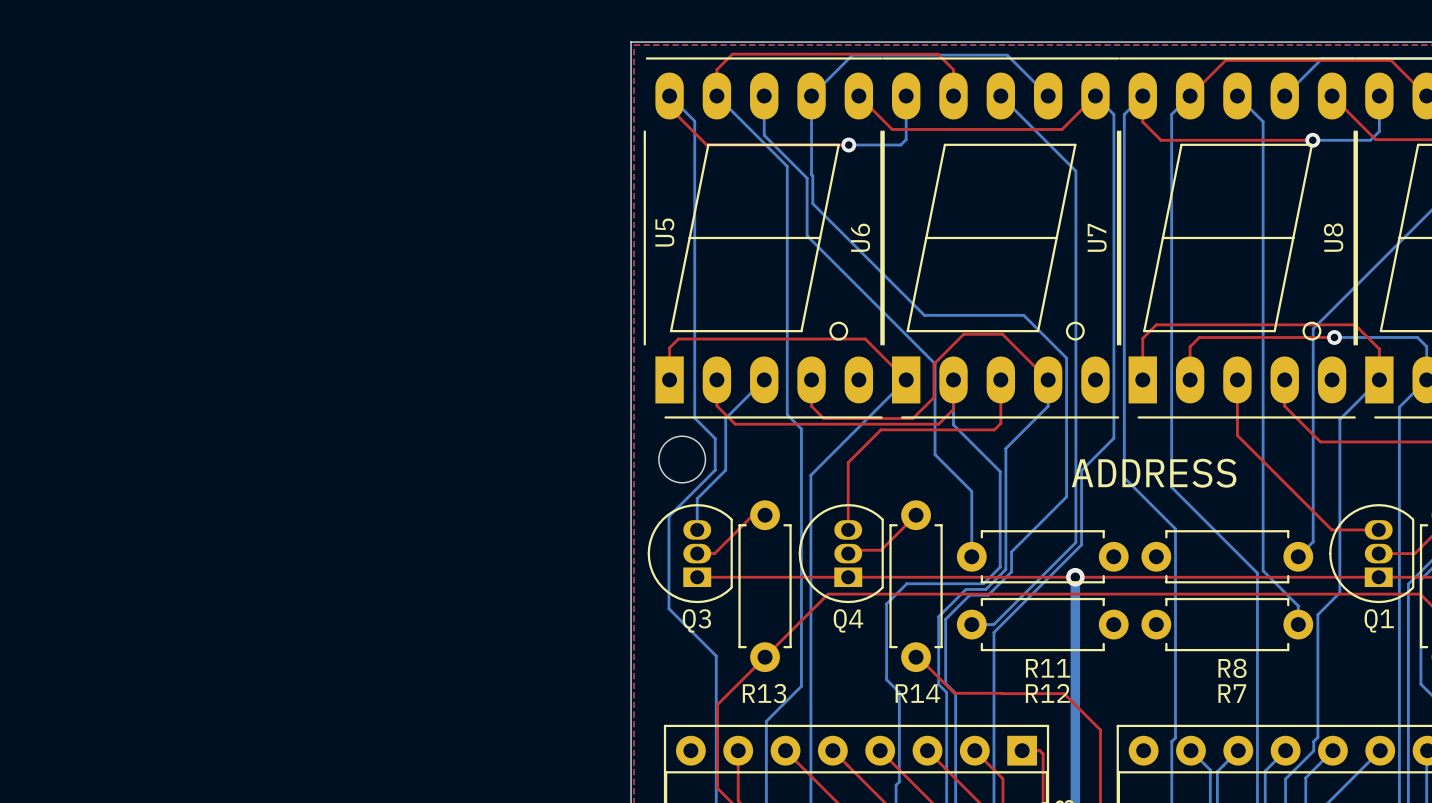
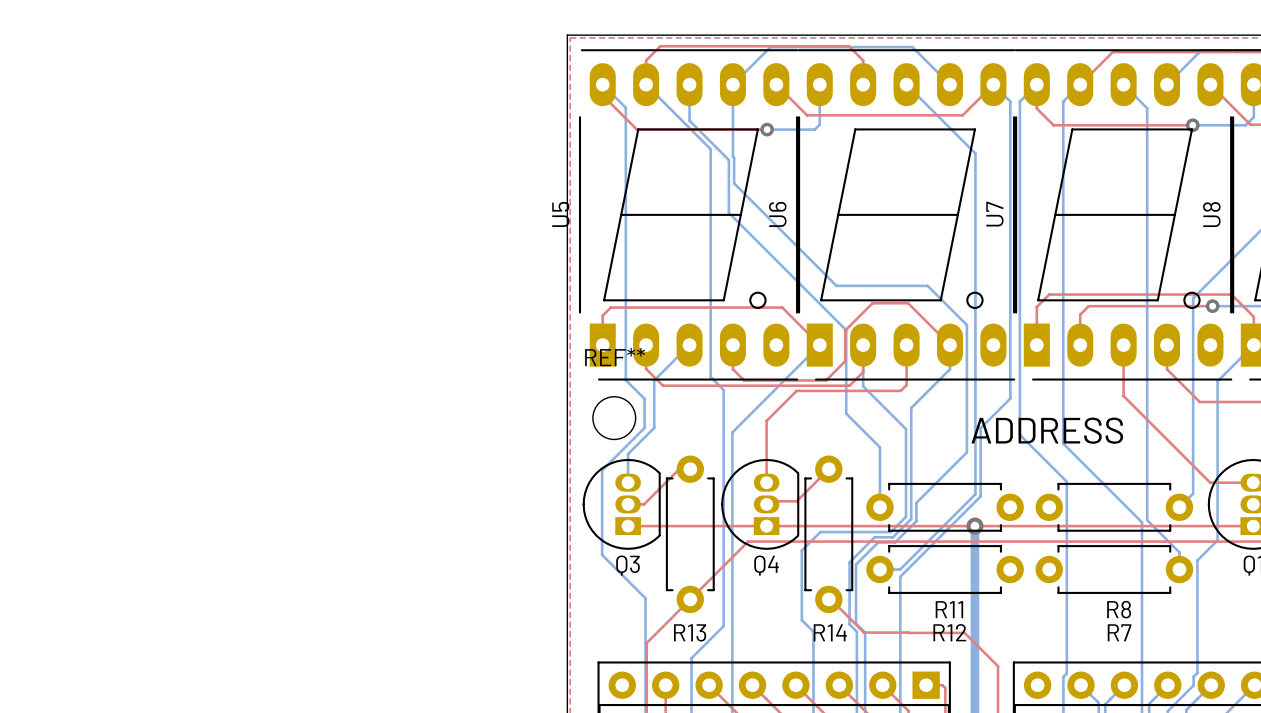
U5 name position: U5 (664, 232) -> U5 (560, 214)
REF** name: none -> REF** (615, 357)

